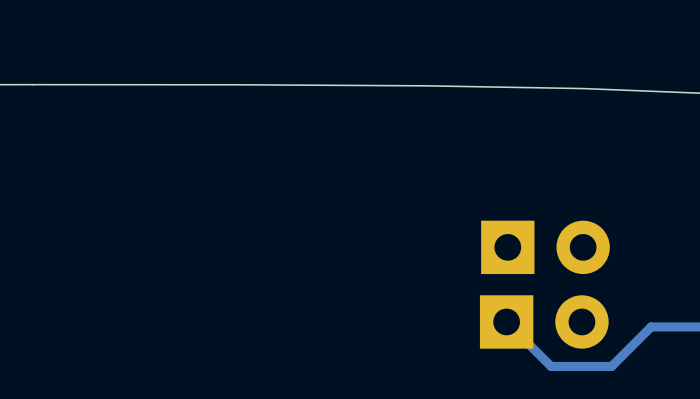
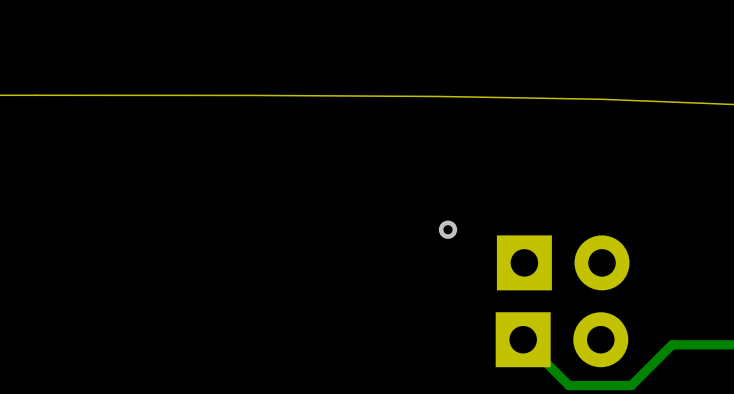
via: none -> (448, 229)

